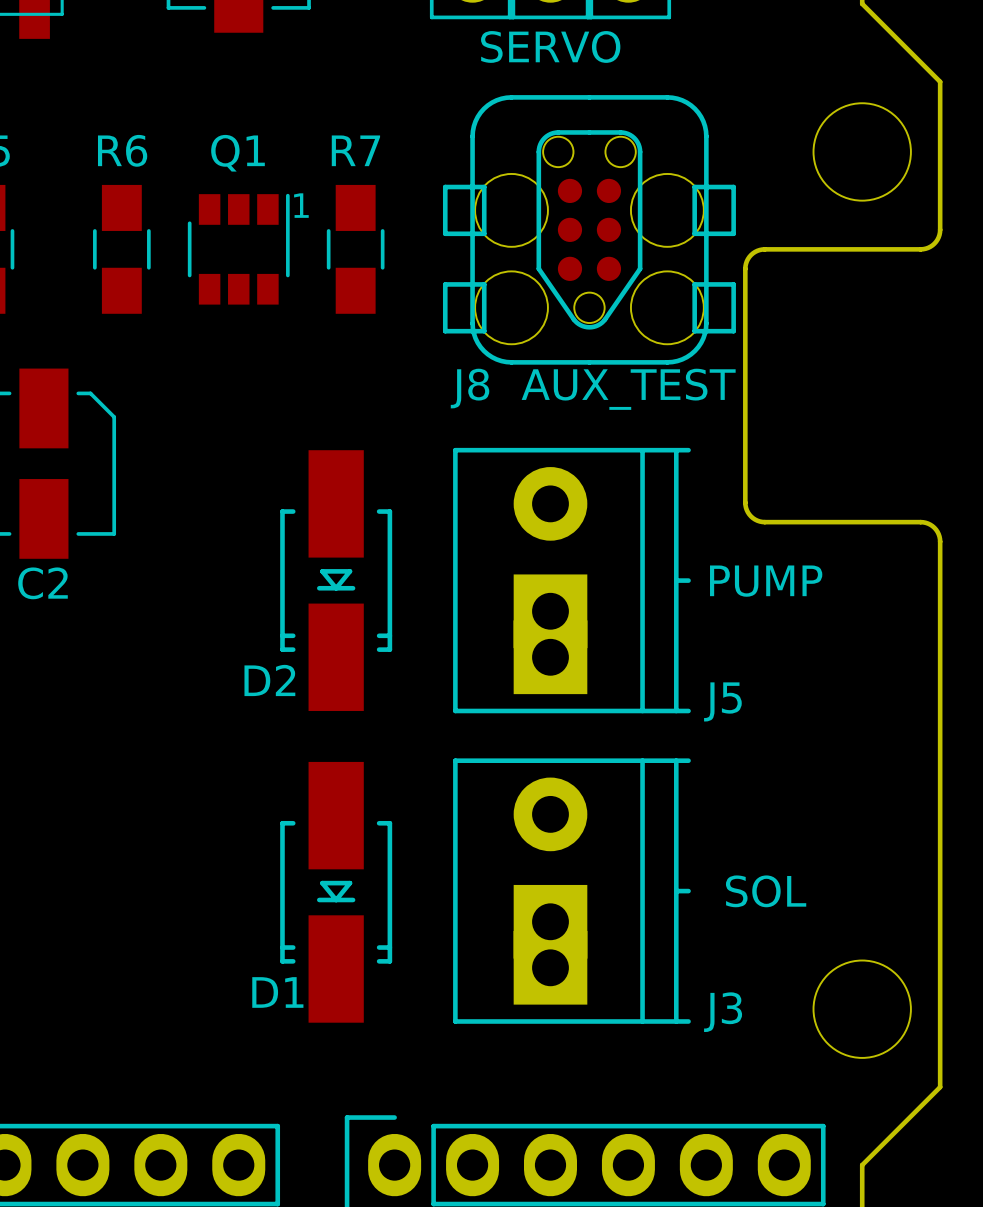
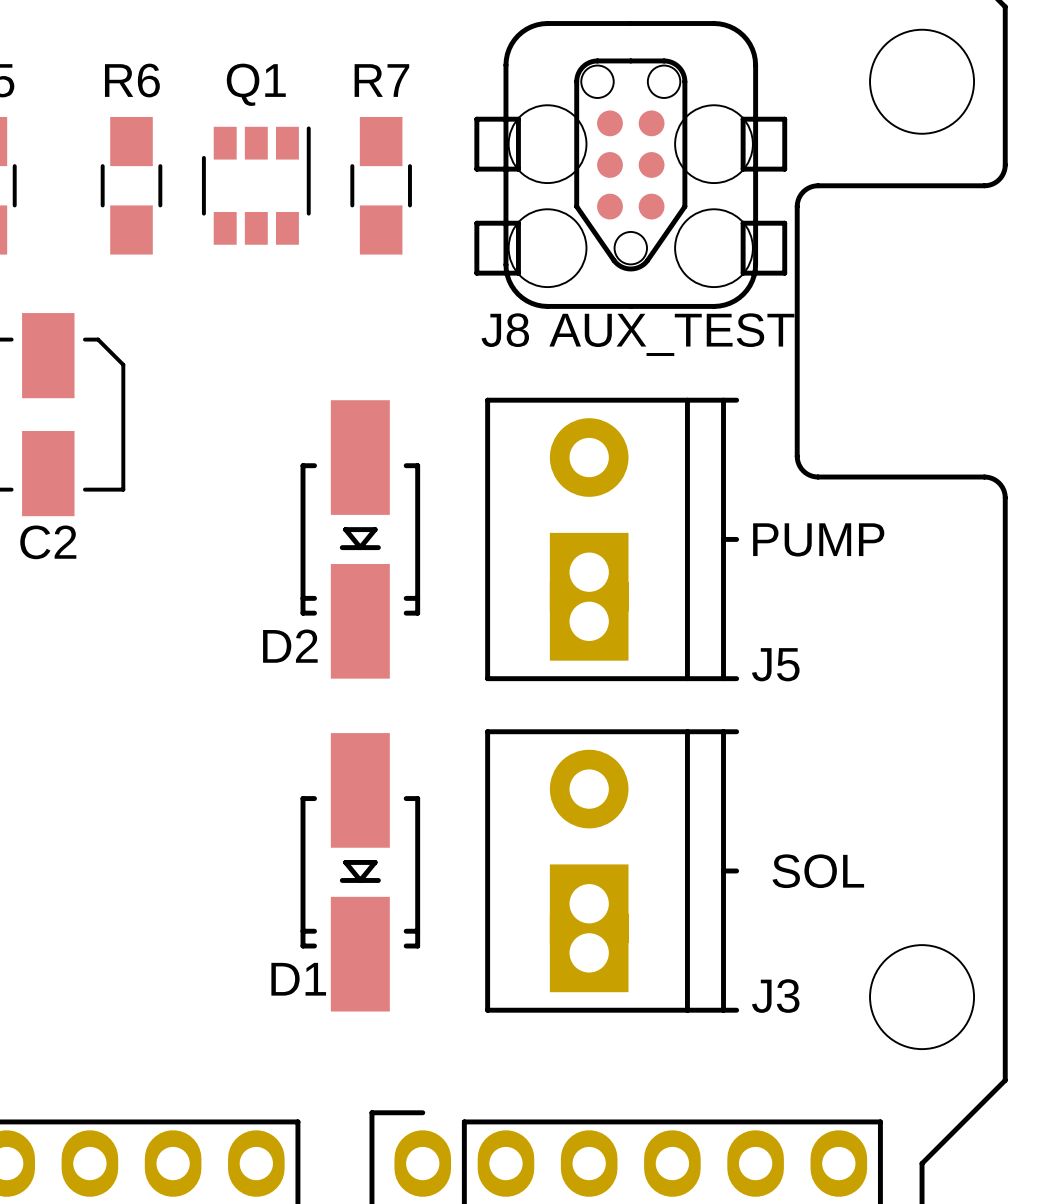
text: 1 (301, 205) -> none

